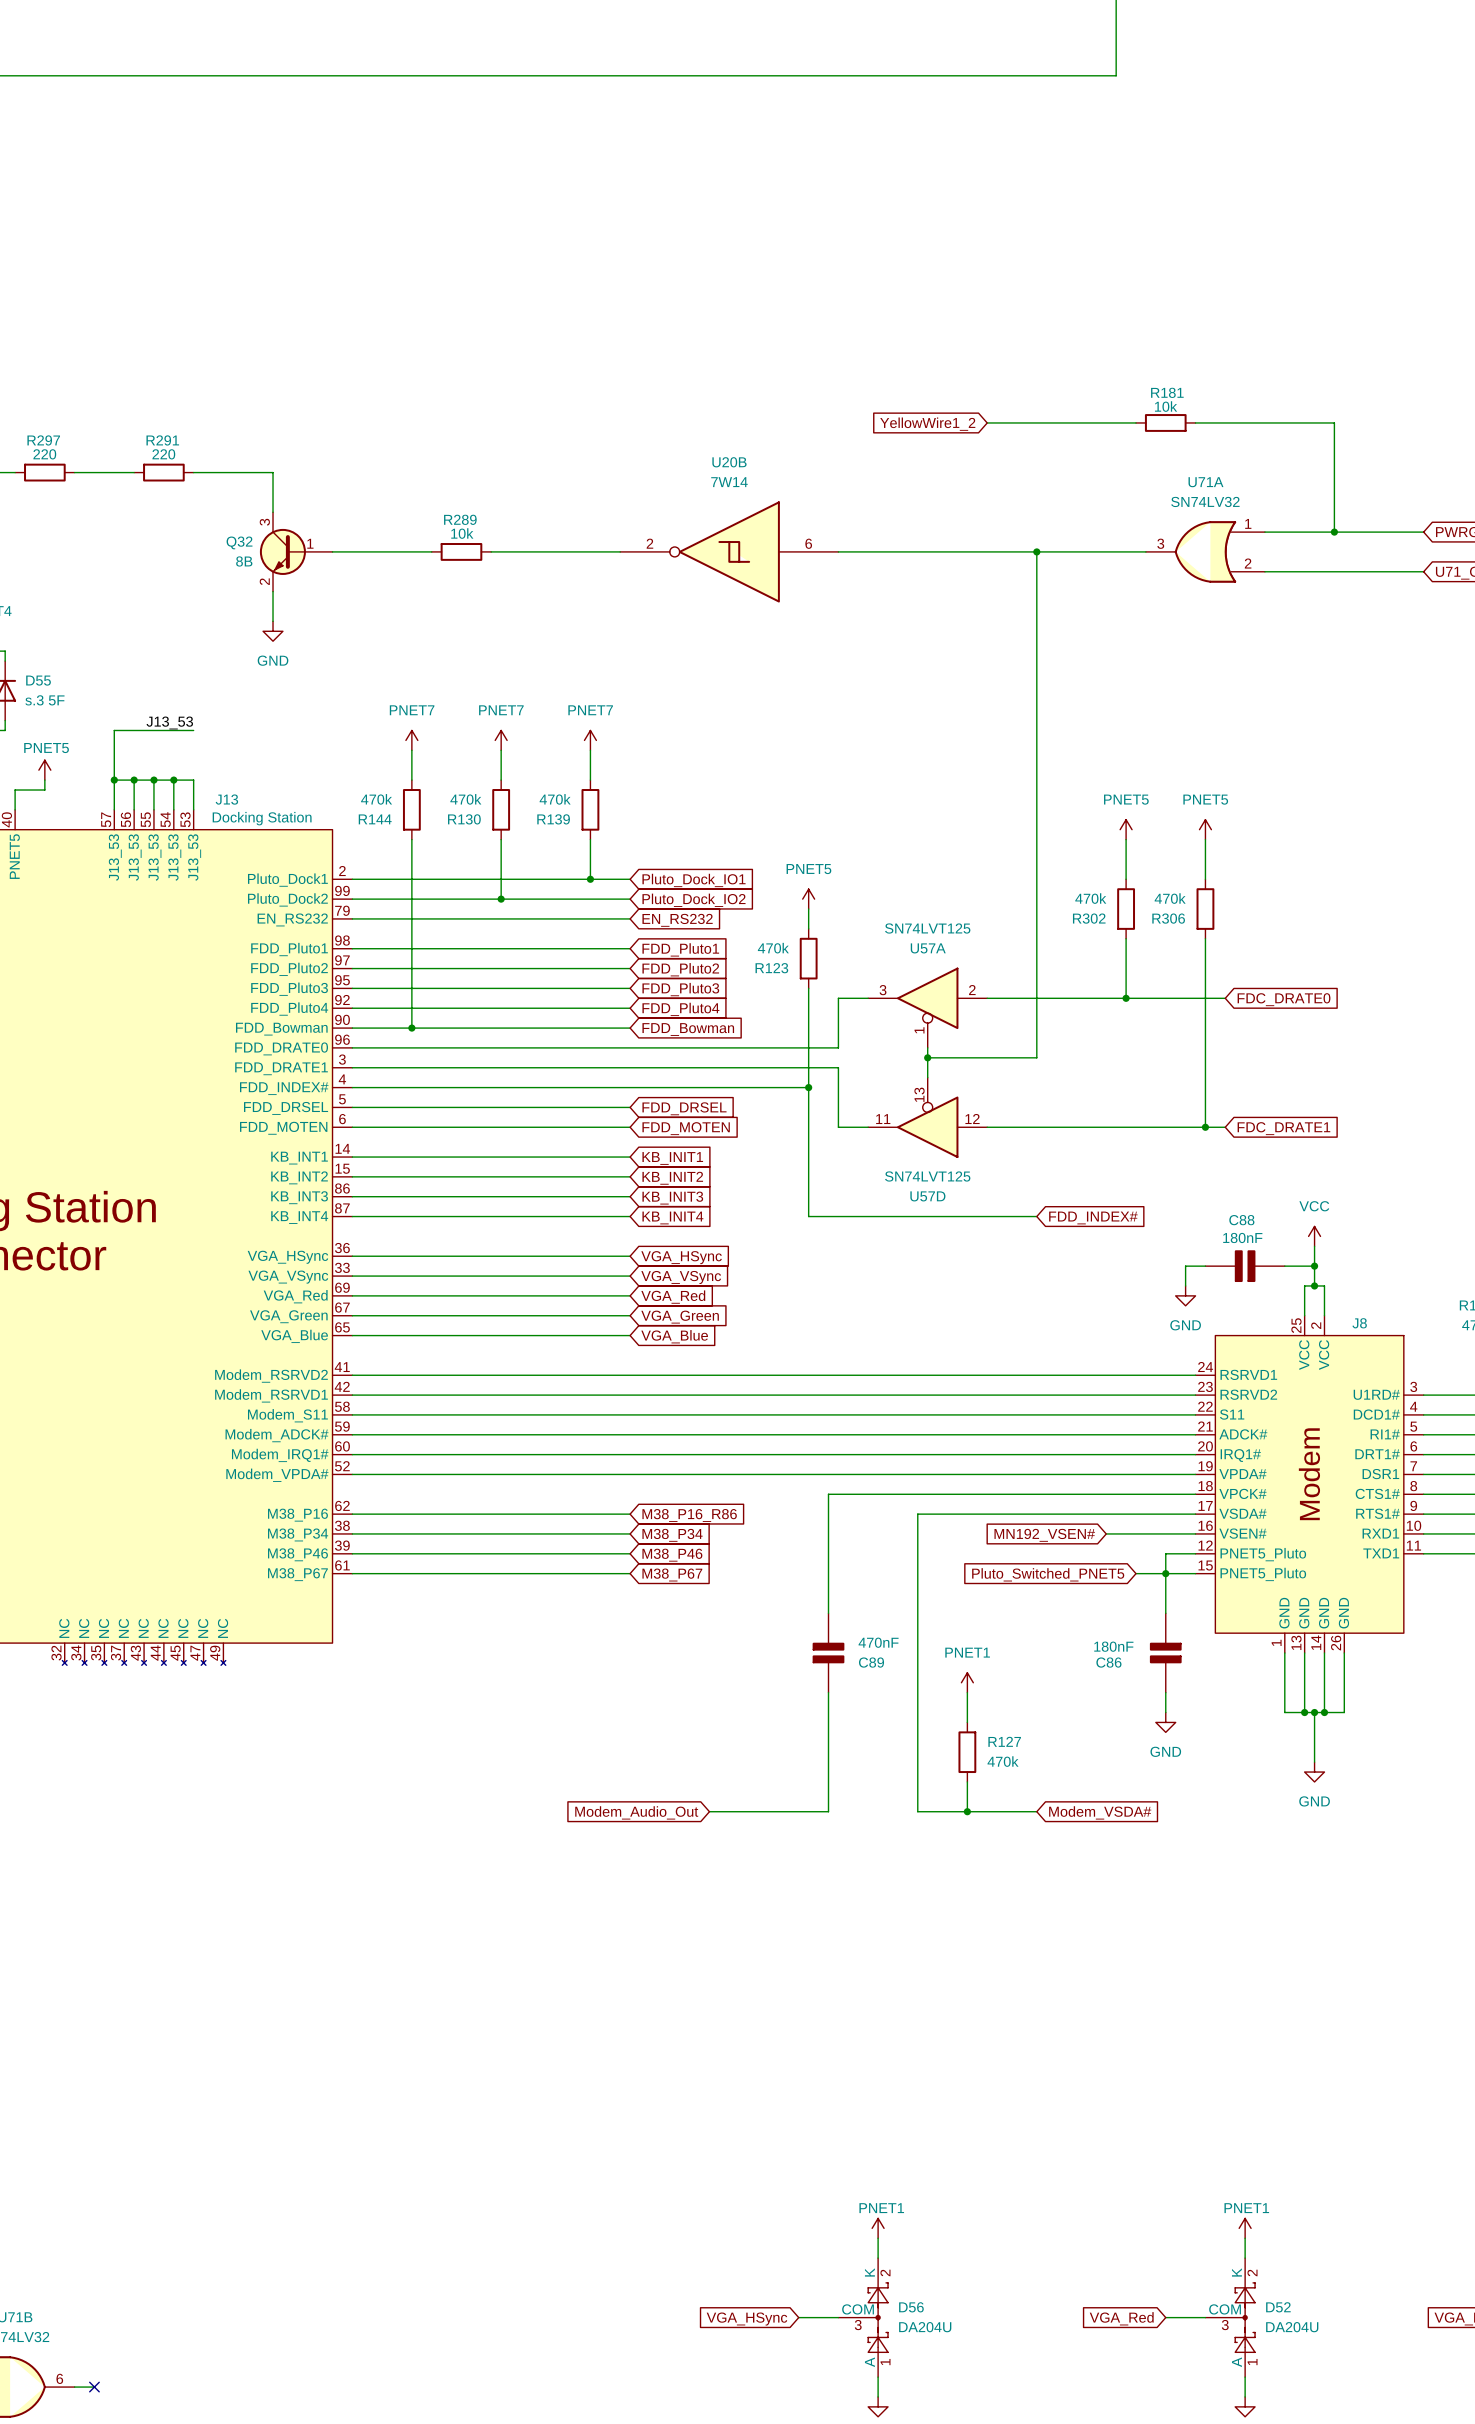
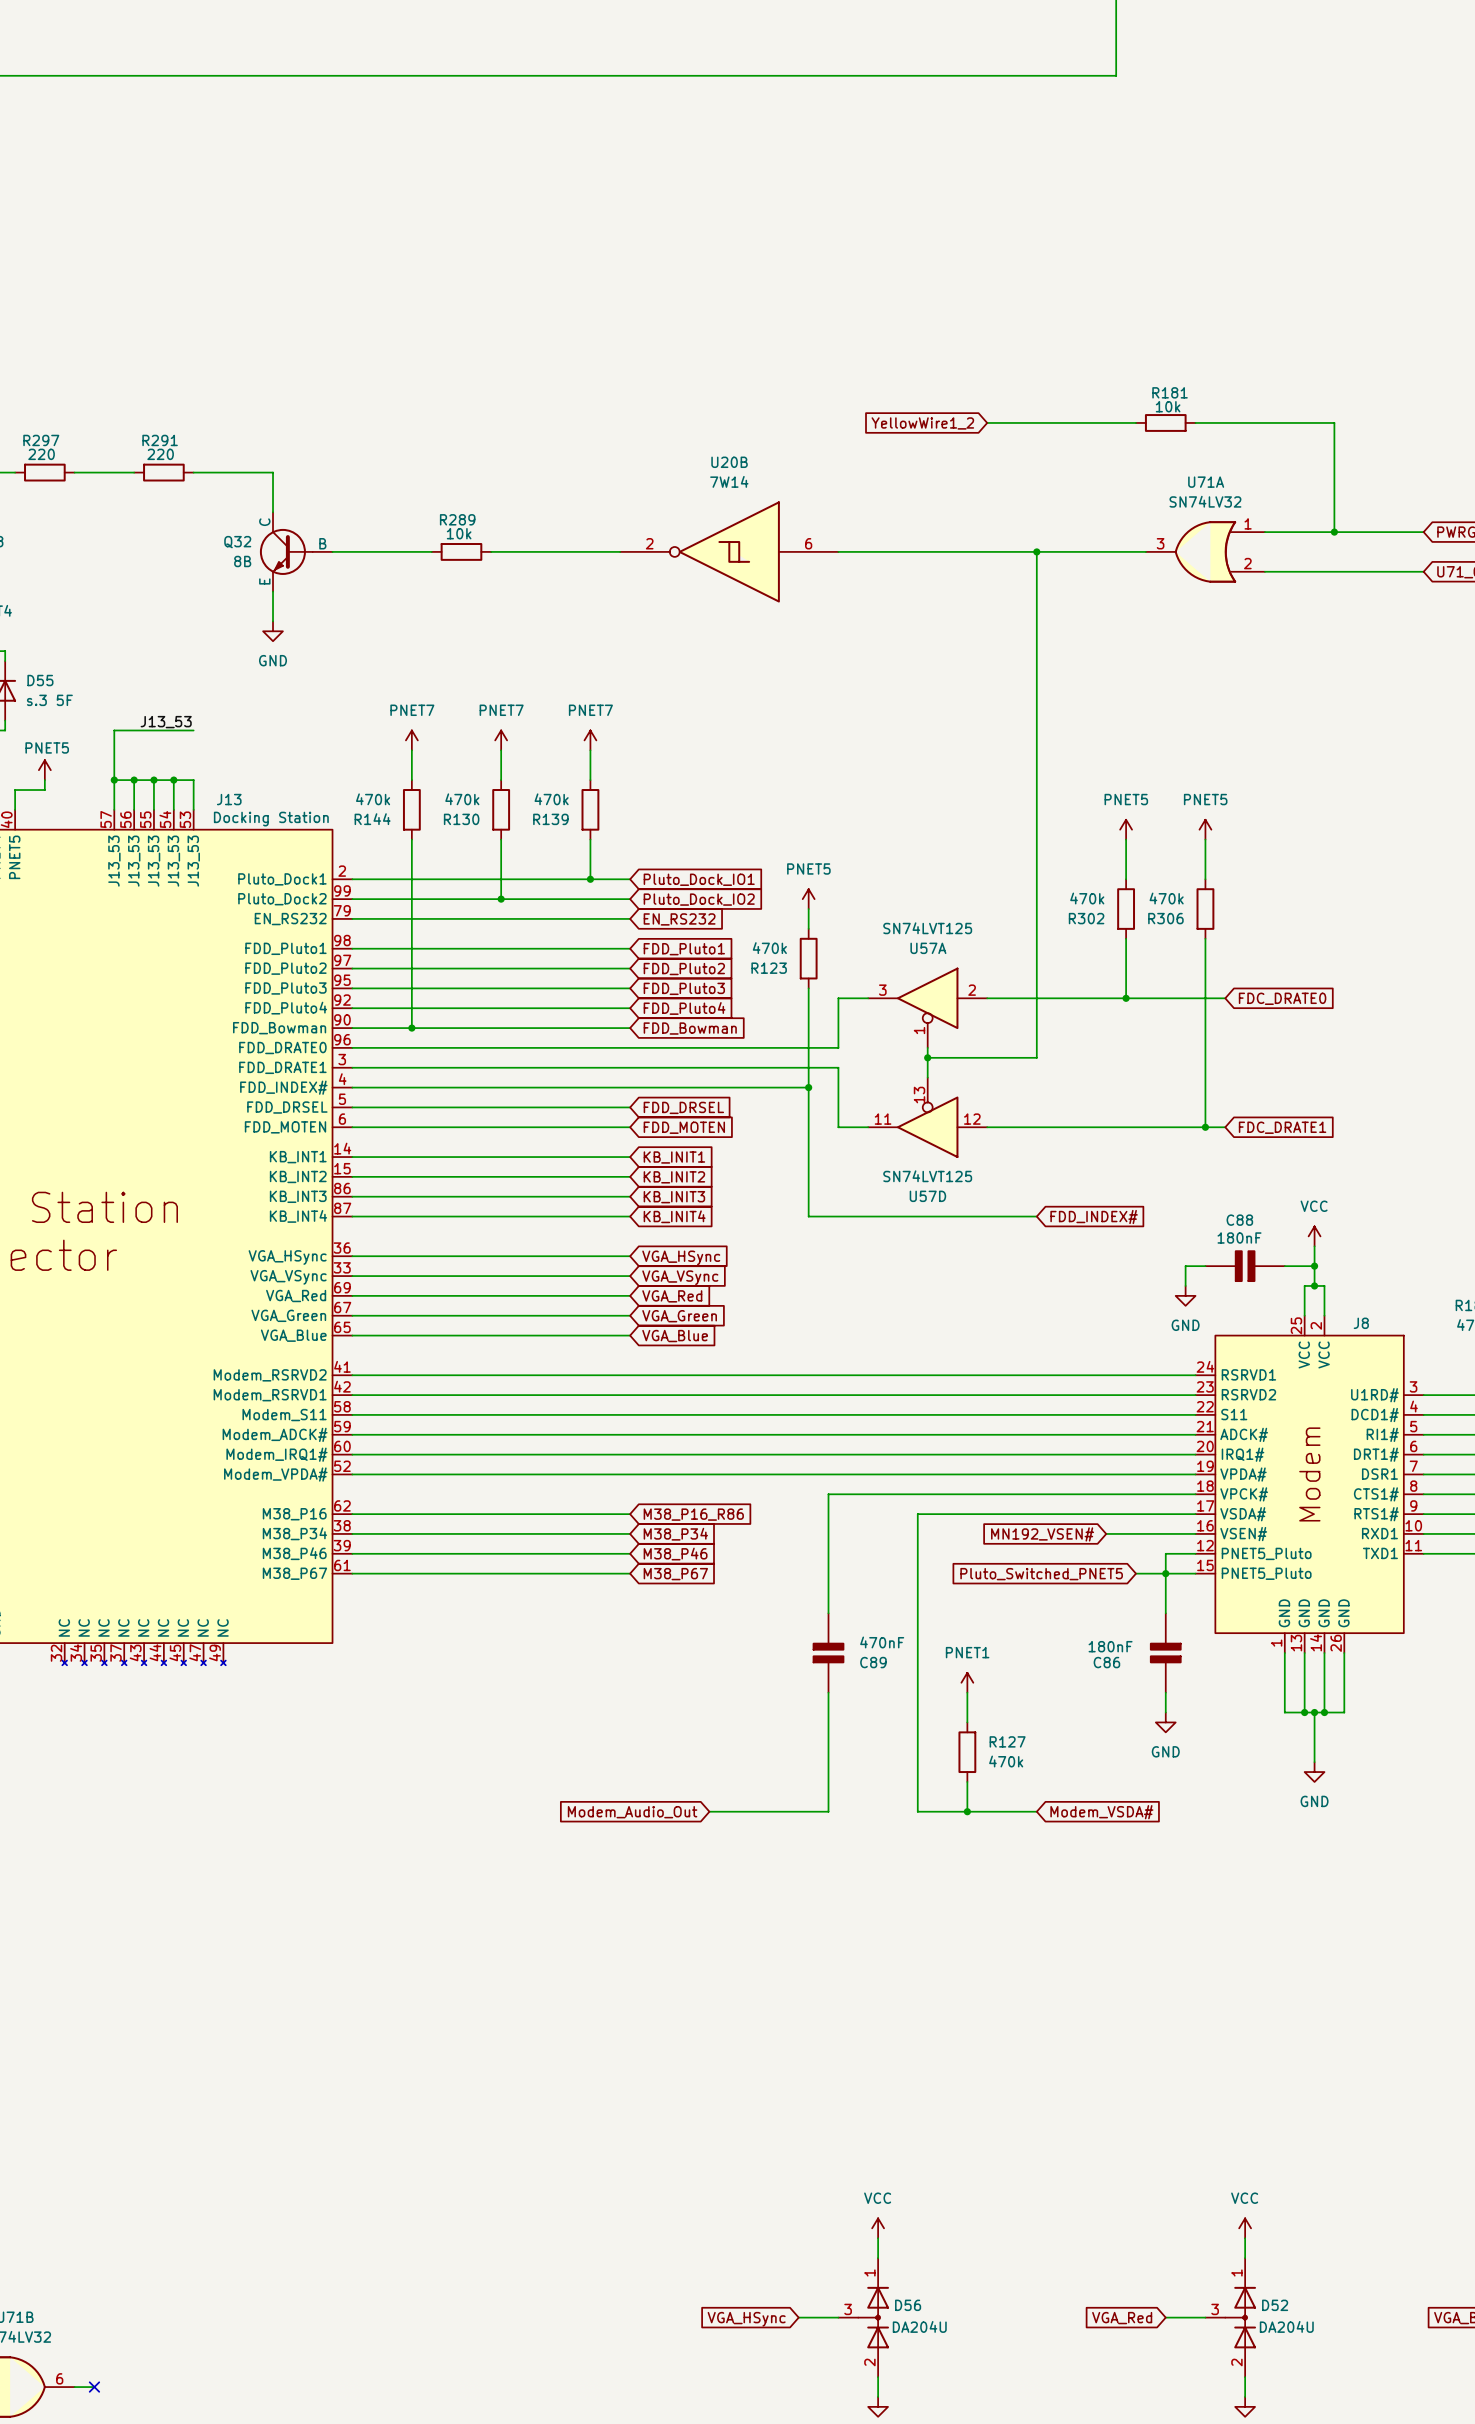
Q32 symbol: [259, 512, 333, 592] -> [259, 512, 333, 592]
power symbol: PNET1 (878, 2228) -> VCC (878, 2228)
power symbol: PNET1 (1245, 2228) -> VCC (1245, 2228)
D56 symbol: [838, 2258, 889, 2378] -> [838, 2258, 890, 2378]
D52 symbol: [1205, 2258, 1256, 2378] -> [1205, 2258, 1257, 2378]

